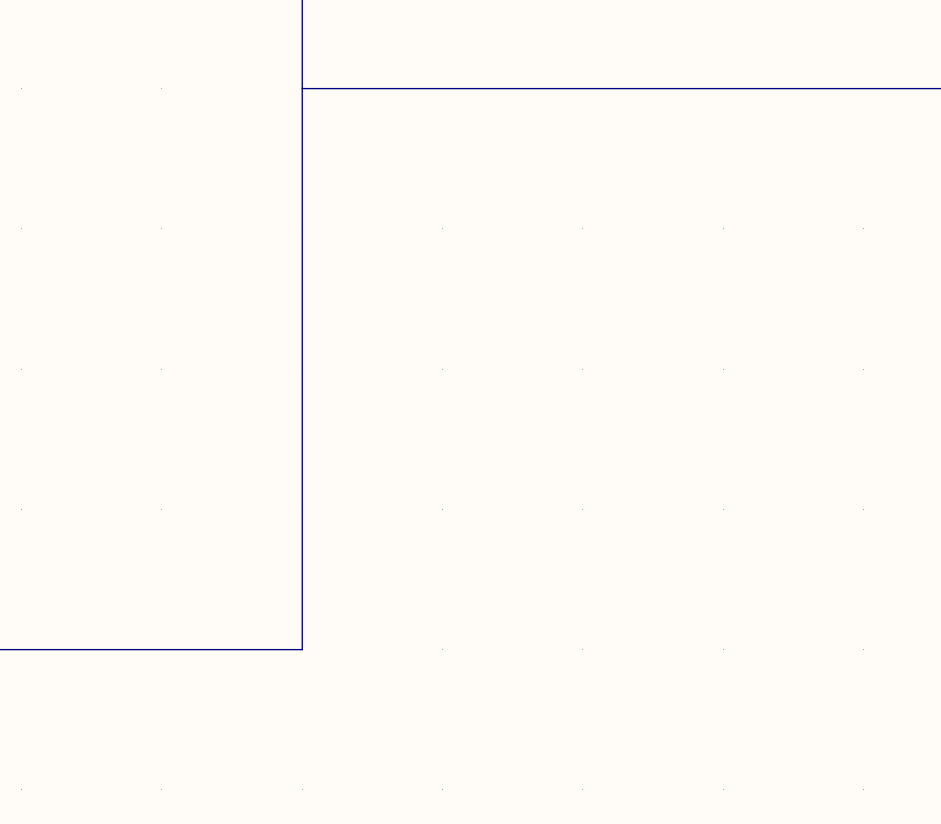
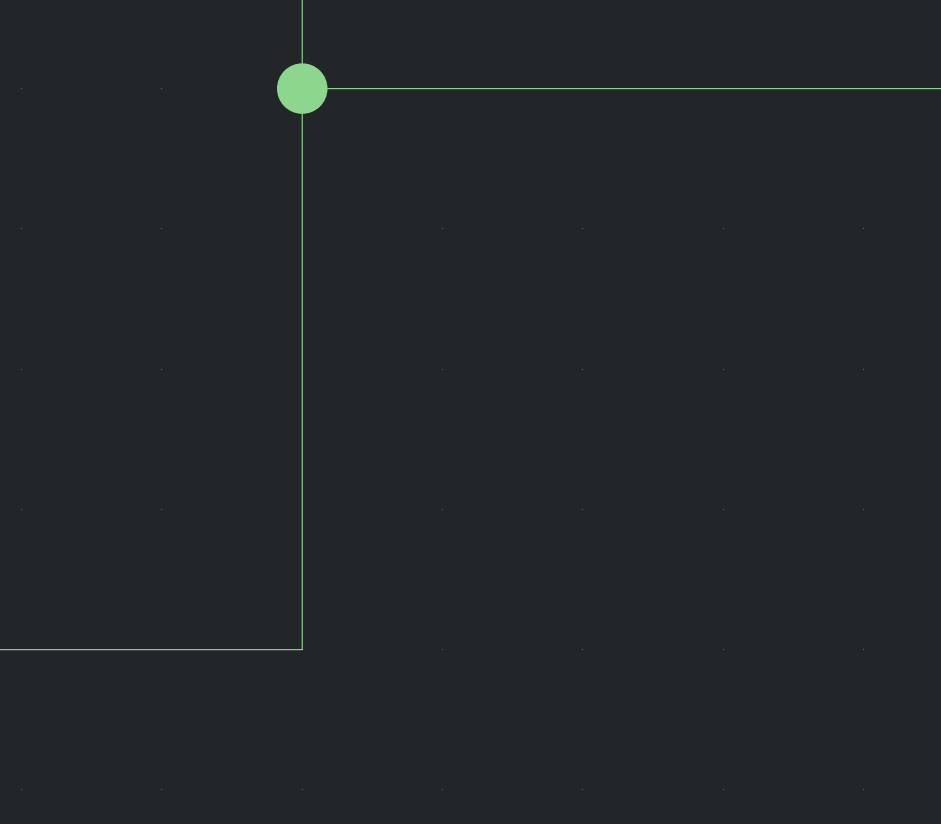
junction: none -> (302, 88)

